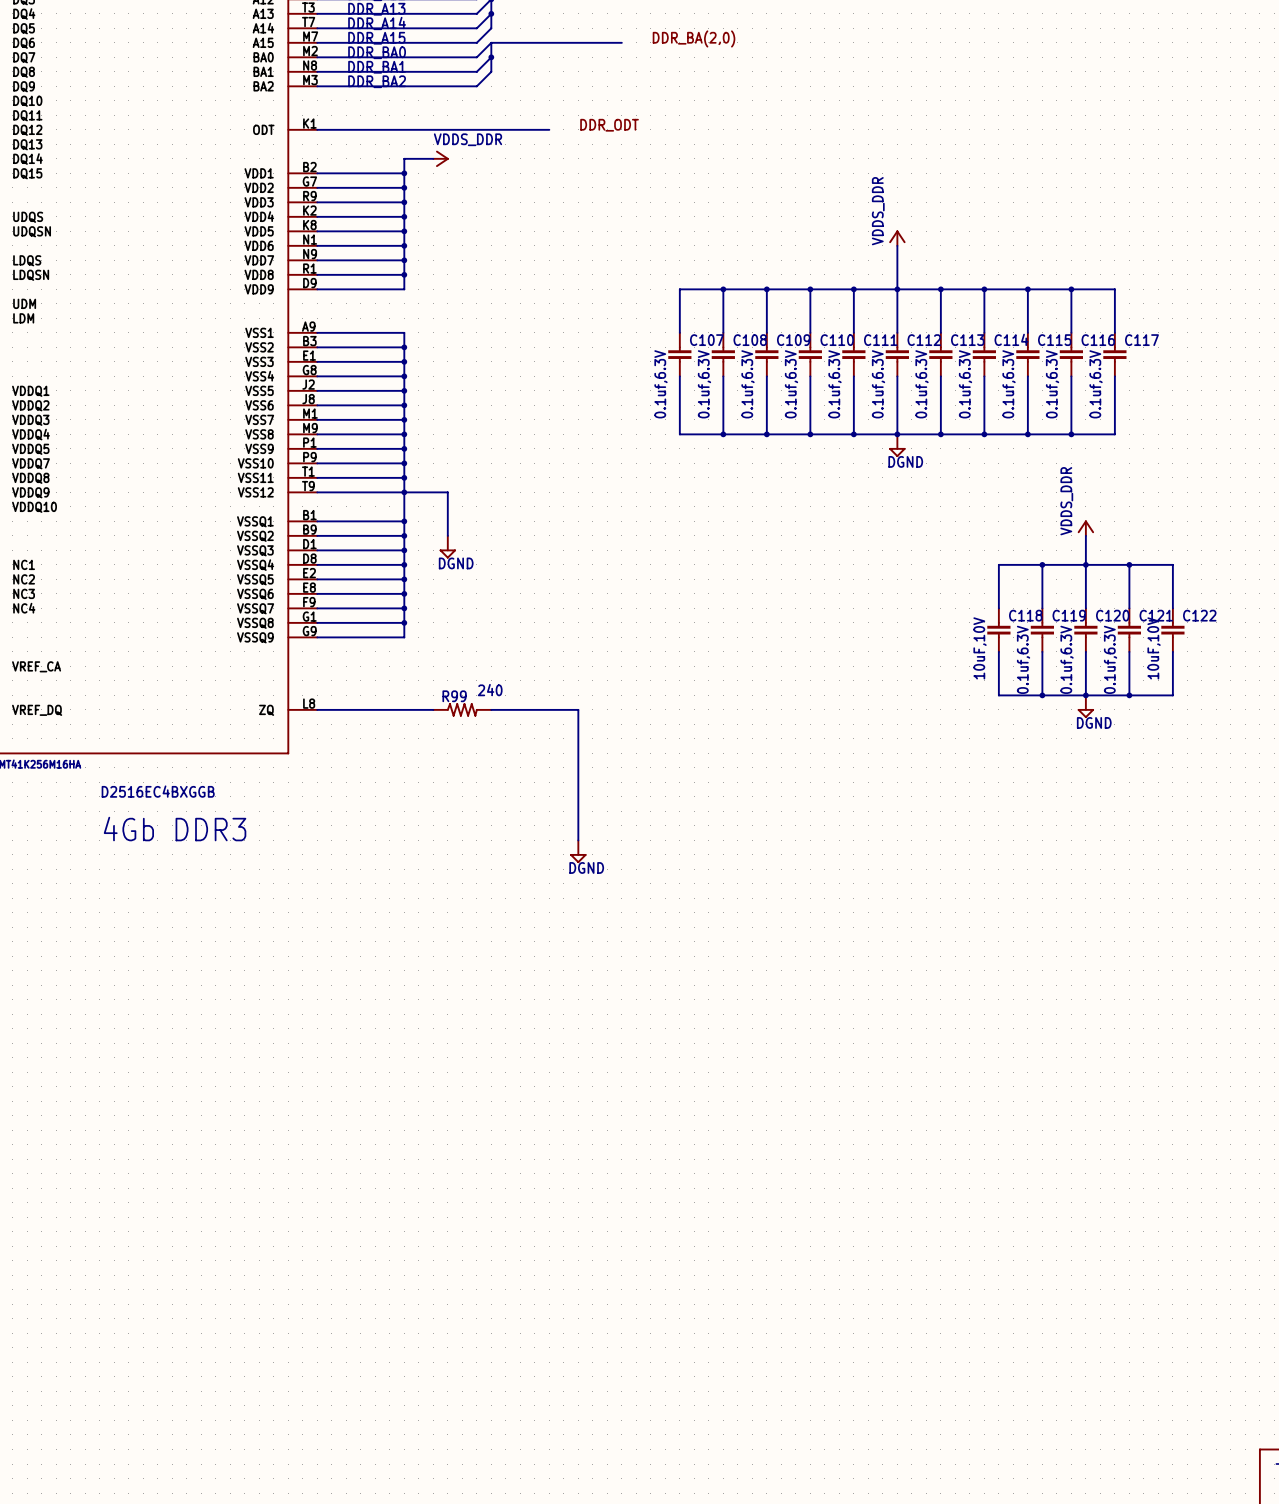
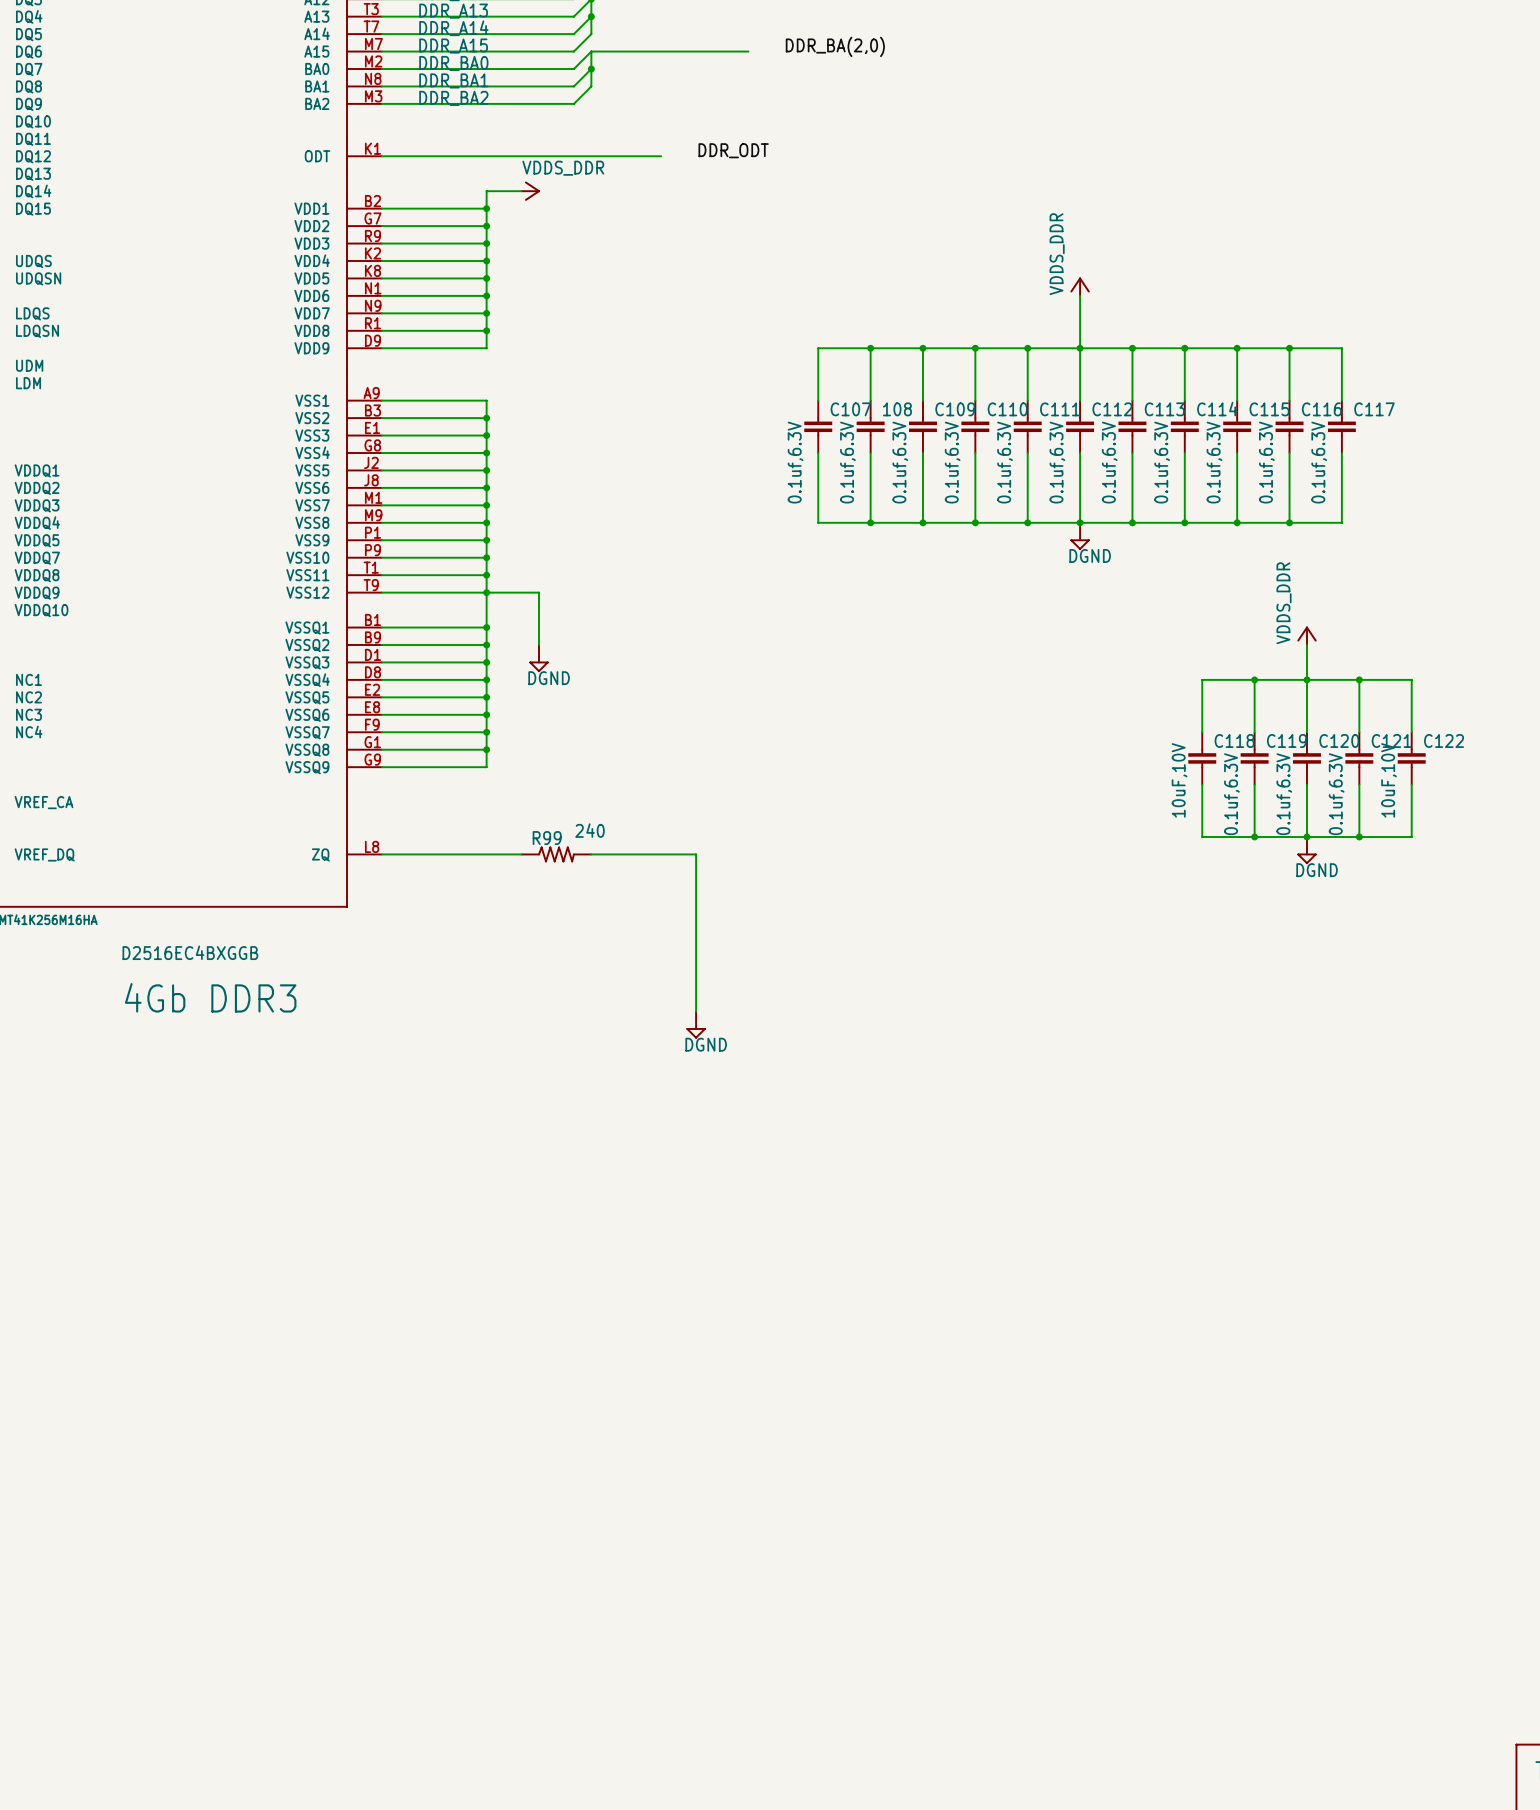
C108 name: C108 (750, 340) -> 108 (897, 409)

